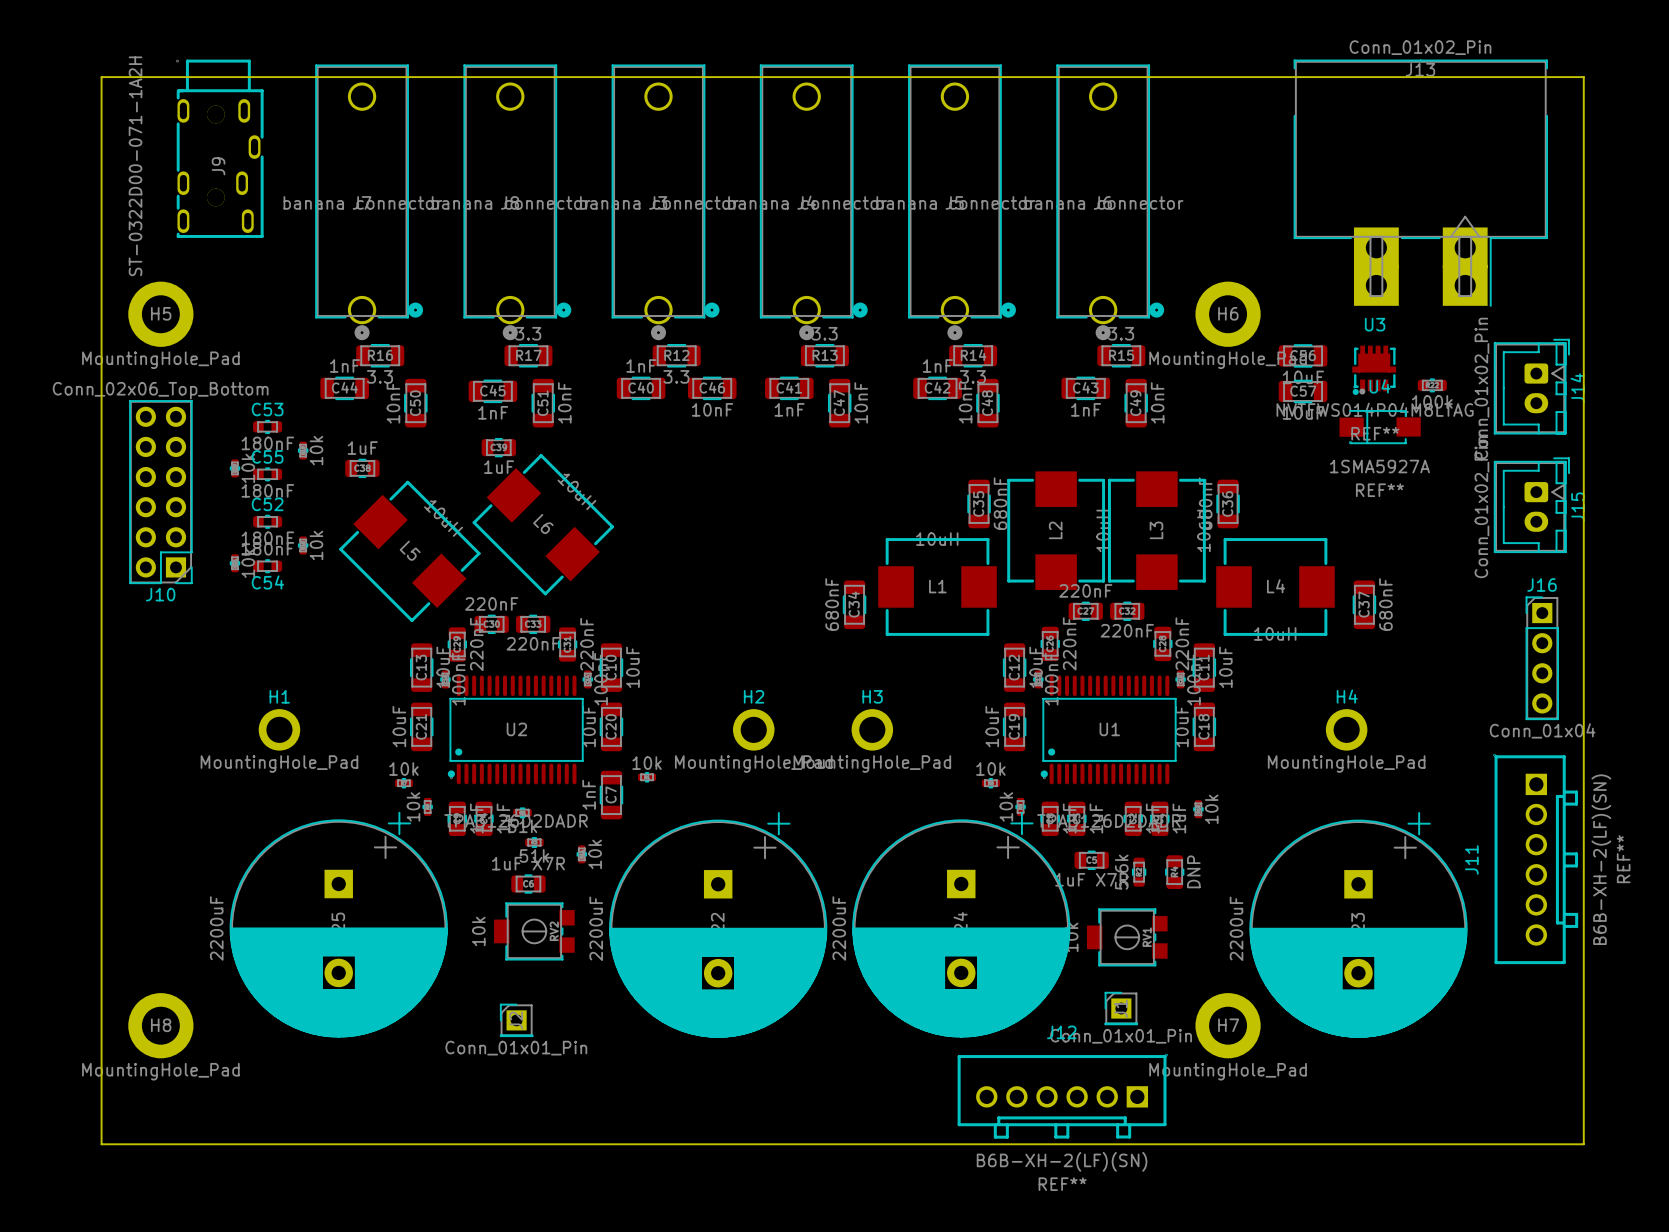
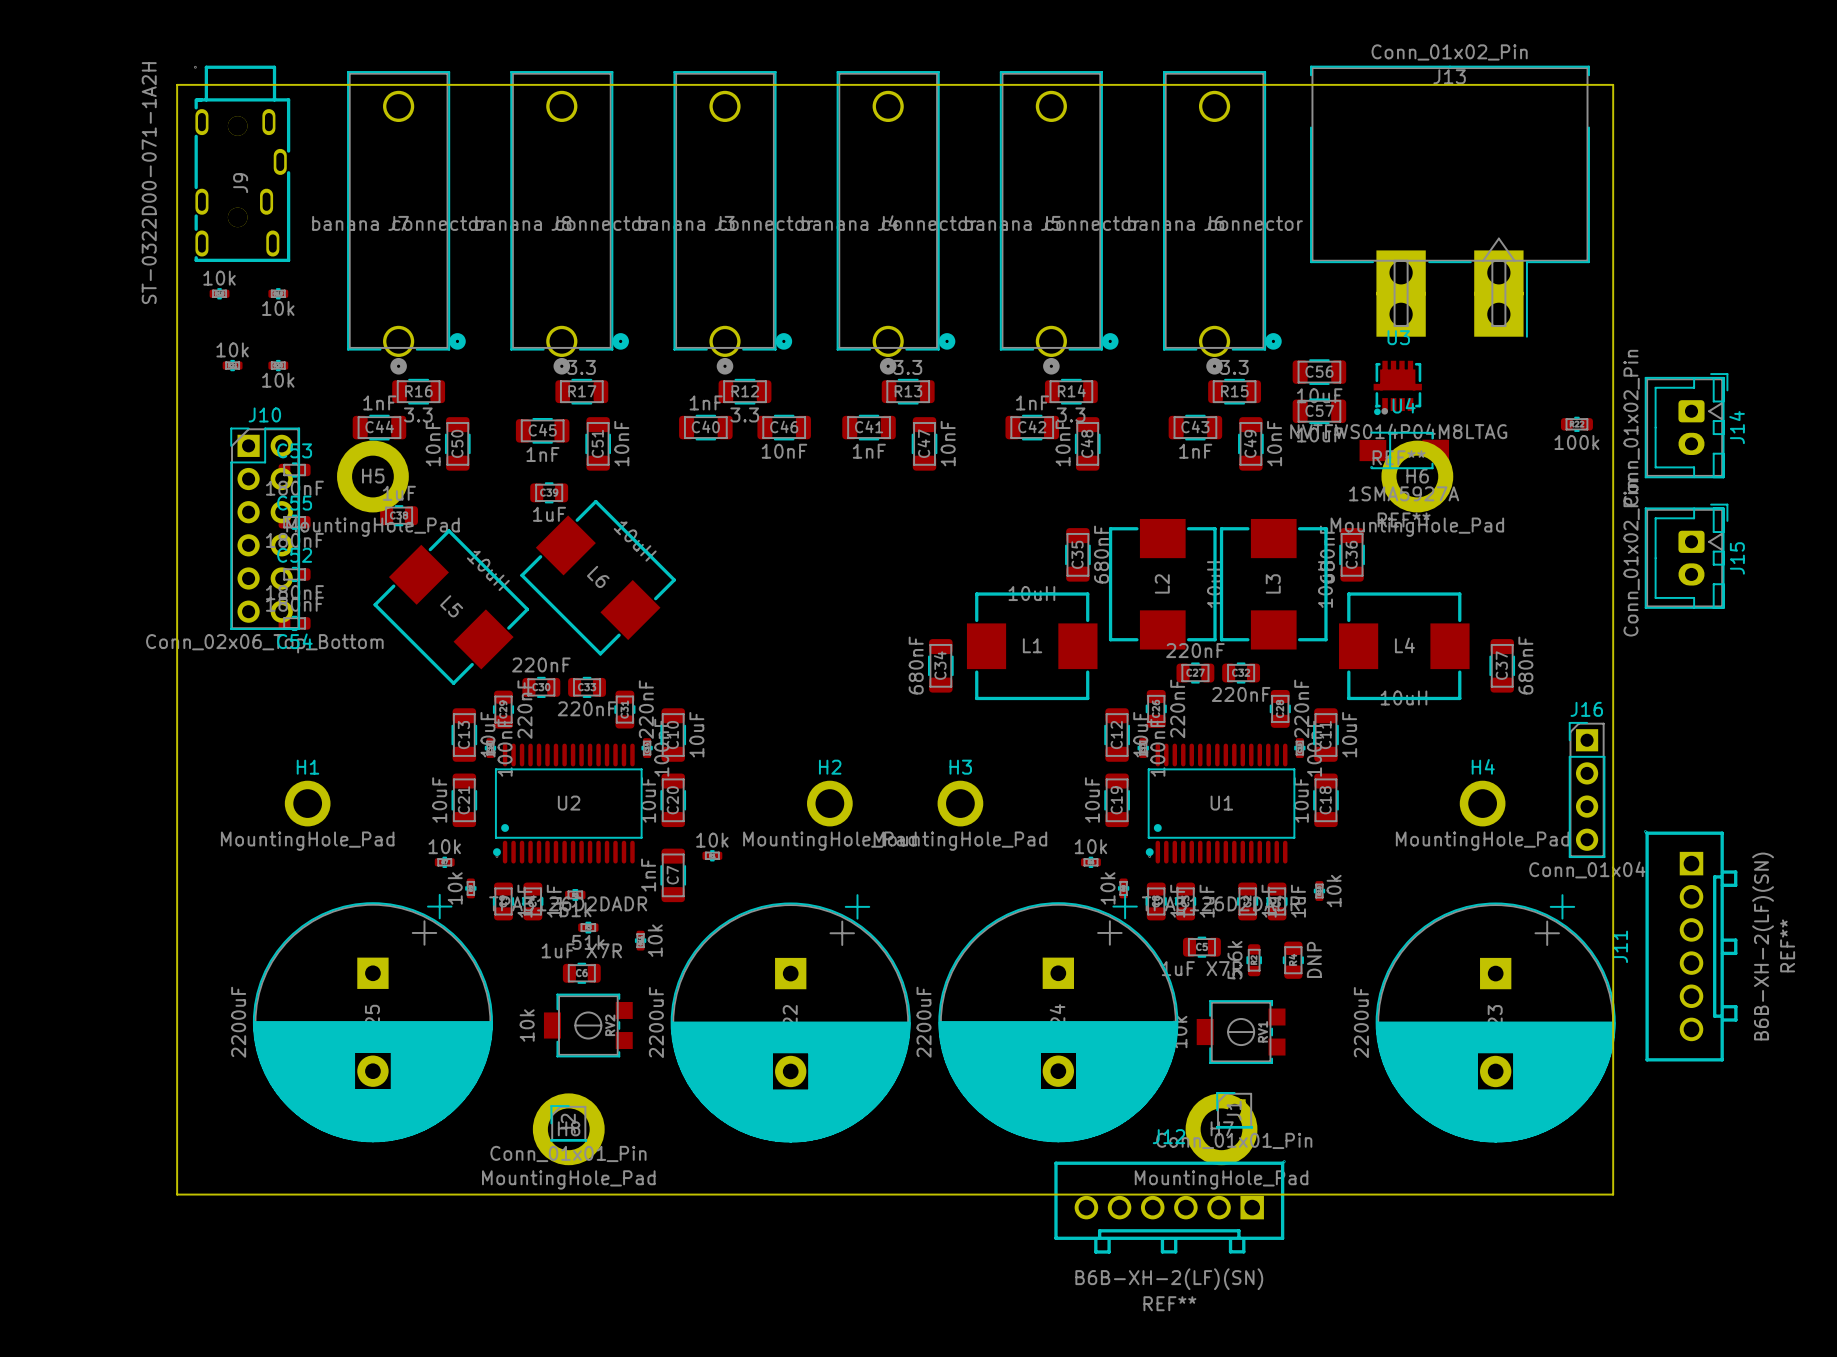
board edge: (160, 77) (101, 77) (101, 1144) (1583, 1144) (1583, 77) (1465, 77) -> (177, 84) (177, 1194) (1613, 1194) (1613, 84)
J13 position: (1420, 183) -> (1449, 201)
H5 position: (160, 314) -> (372, 476)
H6 position: (1228, 314) -> (1417, 476)
C56 position: (1303, 355) -> (1319, 372)
U3 position: (1374, 370) -> (1397, 387)
C57 position: (1303, 391) -> (1319, 411)
U4 position: (1380, 427) -> (1404, 450)
part rotation: 0° (303, 450) -> 90° clockwise (278, 293)
part position: (303, 450) -> (278, 293)
part rotation: 0° (234, 468) -> 90° clockwise (278, 365)
part position: (234, 468) -> (278, 365)
J10 rotation: 0° (160, 492) -> 180° (265, 528)
part rotation: 0° (303, 545) -> 90° clockwise (219, 293)
part position: (303, 545) -> (219, 293)
part rotation: 0° (234, 563) -> 90° clockwise (232, 365)
part position: (234, 563) -> (232, 365)
J16 position: (1542, 658) -> (1587, 789)
H8 position: (160, 1025) -> (568, 1129)
H7 position: (1228, 1025) -> (1221, 1129)

